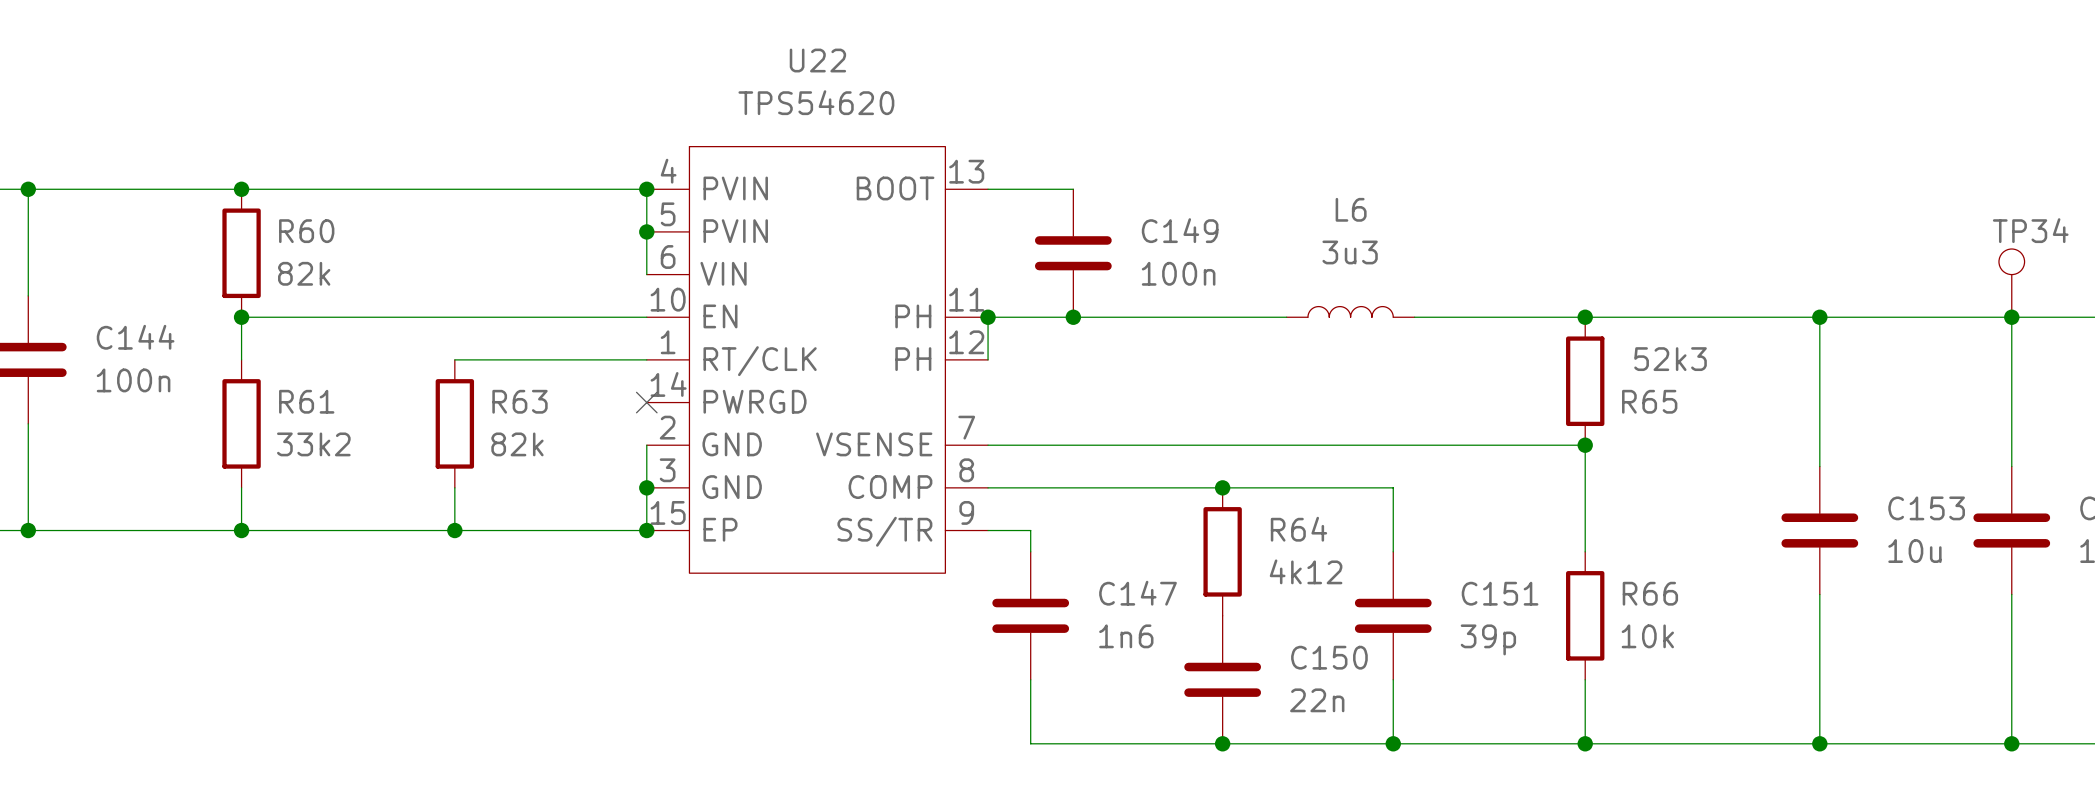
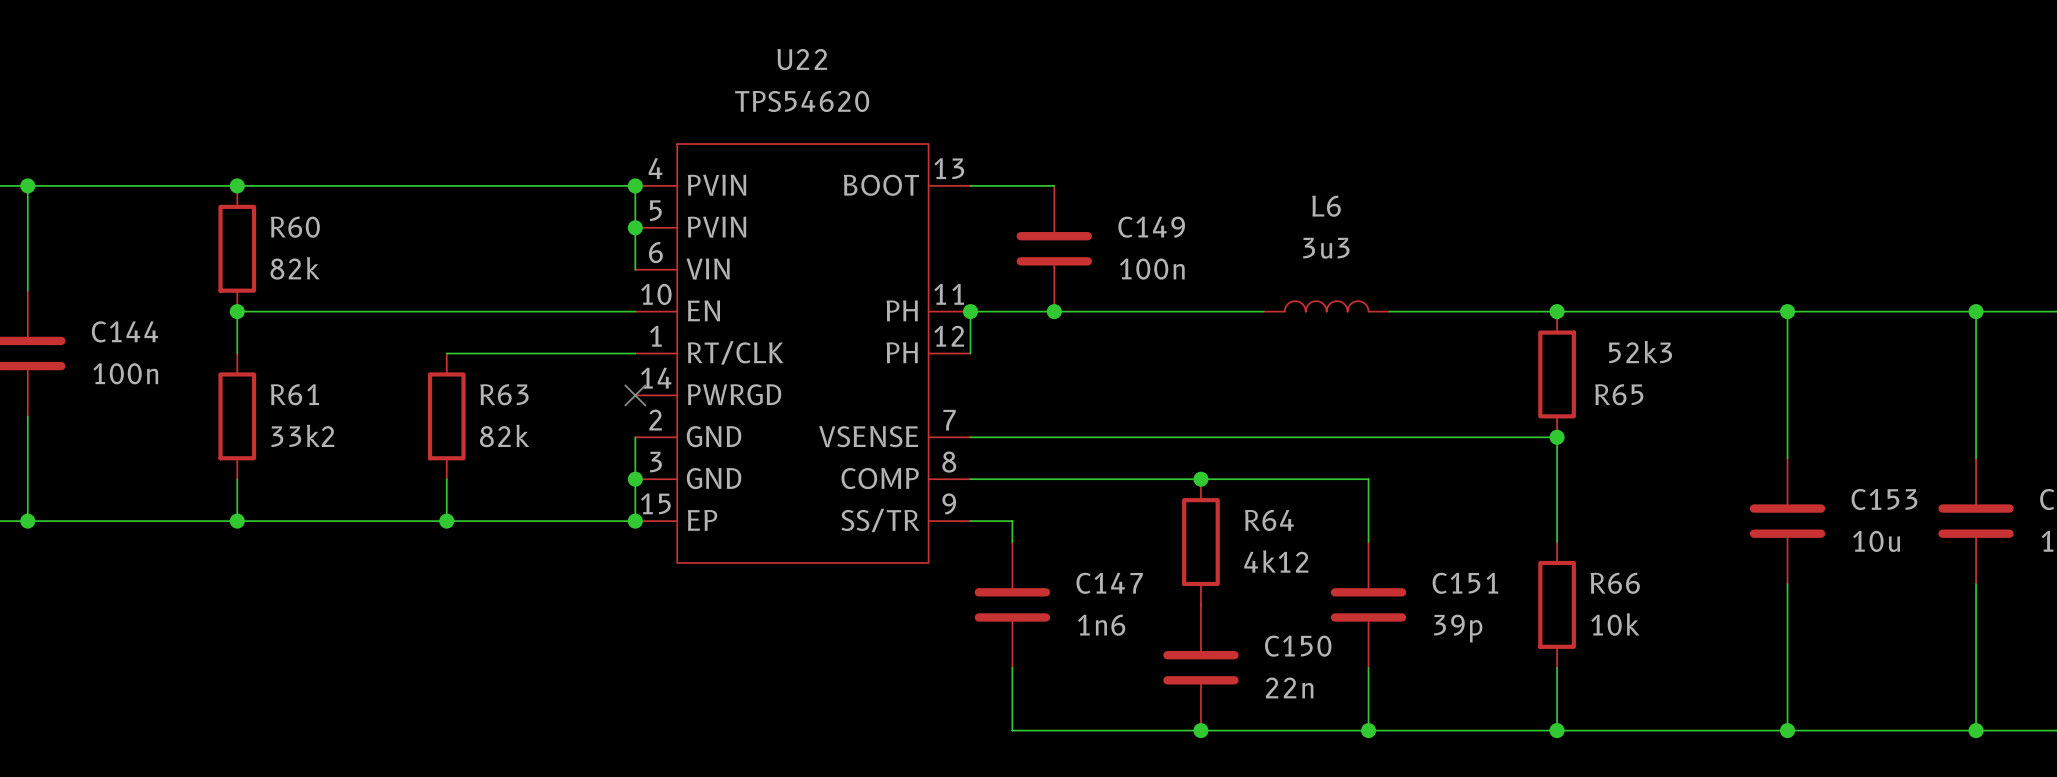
TP34: (2011, 283) -> none

